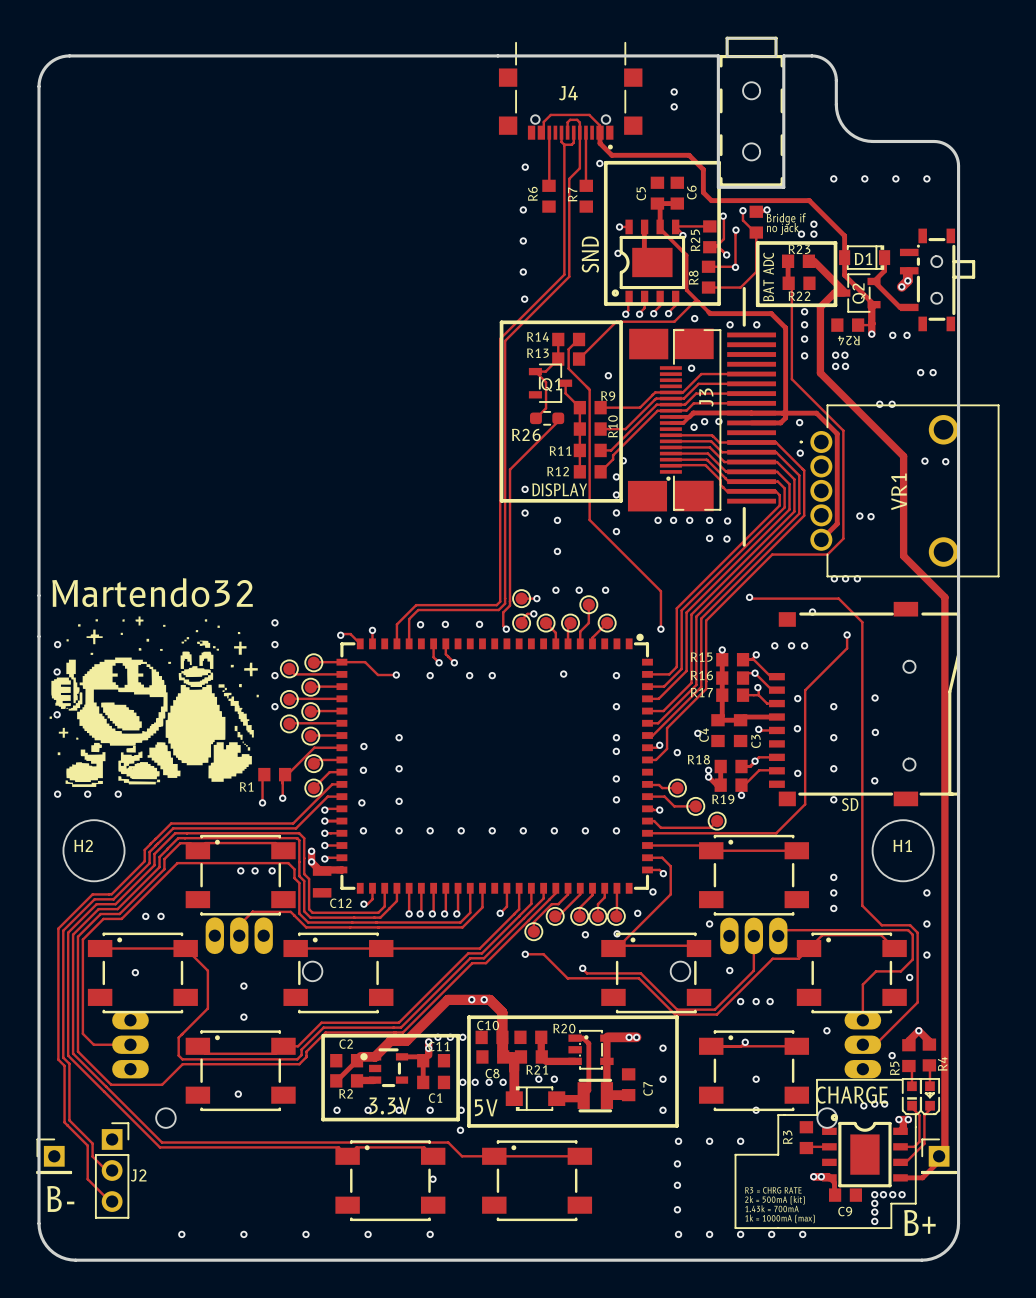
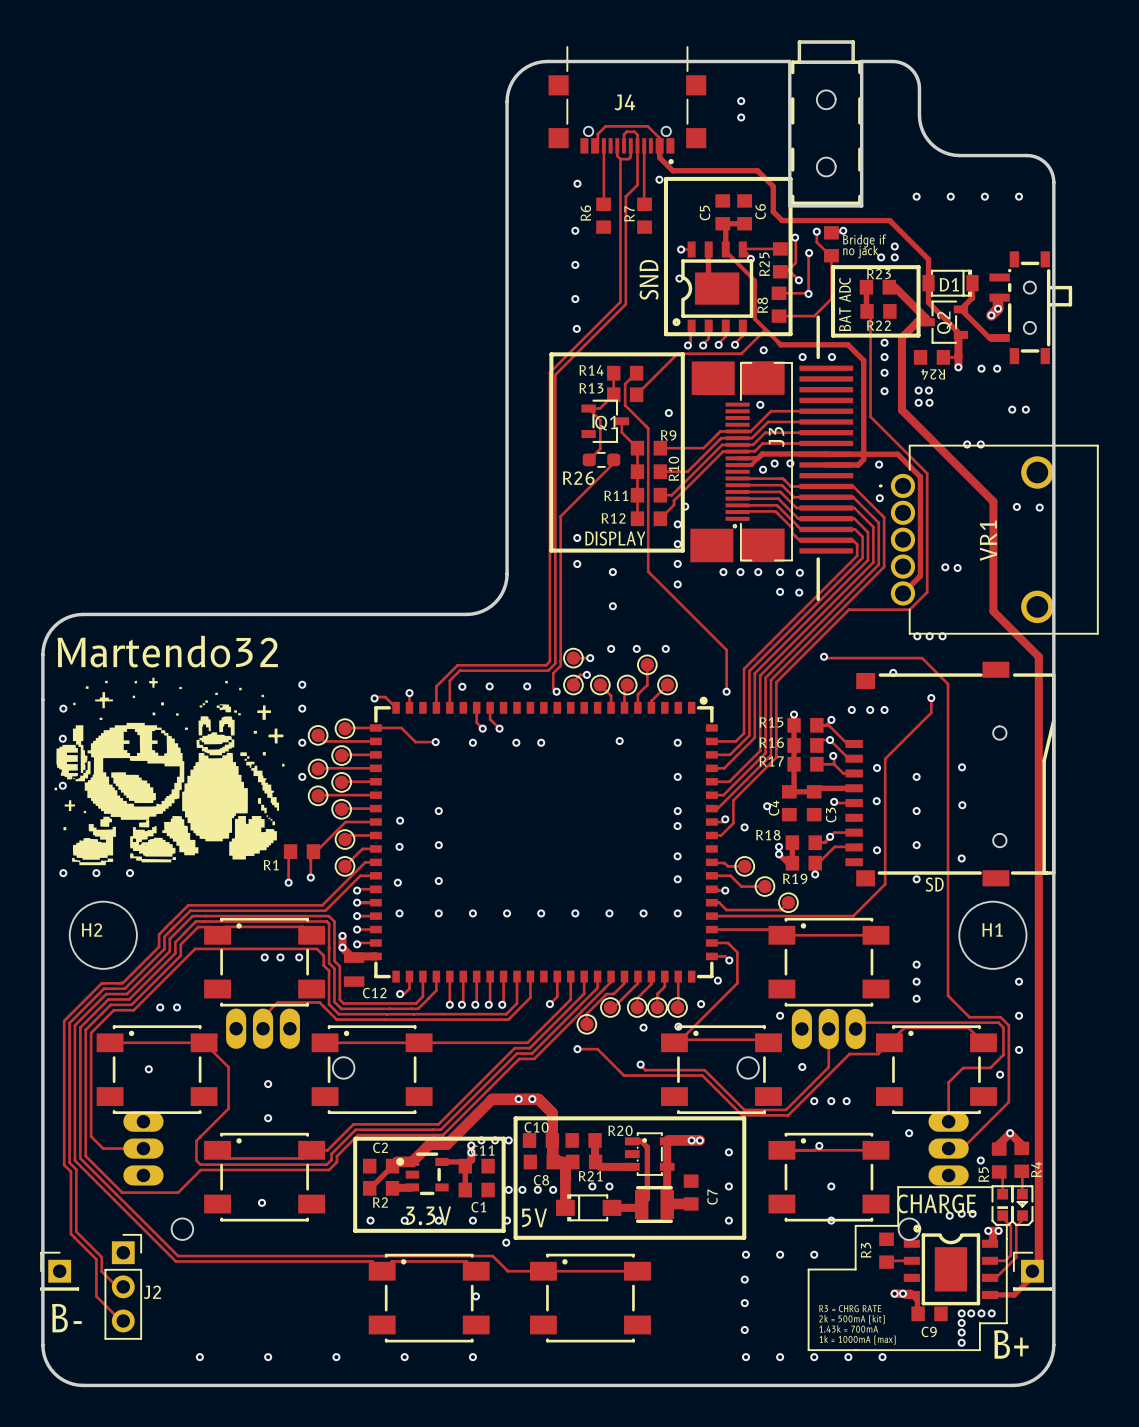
board edge: (497, 55) (69, 55) (56, 58) (45, 67) (40, 76) (39, 86) (39, 595) -> (547, 61) (531, 64) (518, 73) (512, 81) (507, 96) (507, 574) (505, 584) (498, 598) (486, 609) (466, 614) (77, 614) (63, 619) (54, 626) (45, 639) (42, 654)

